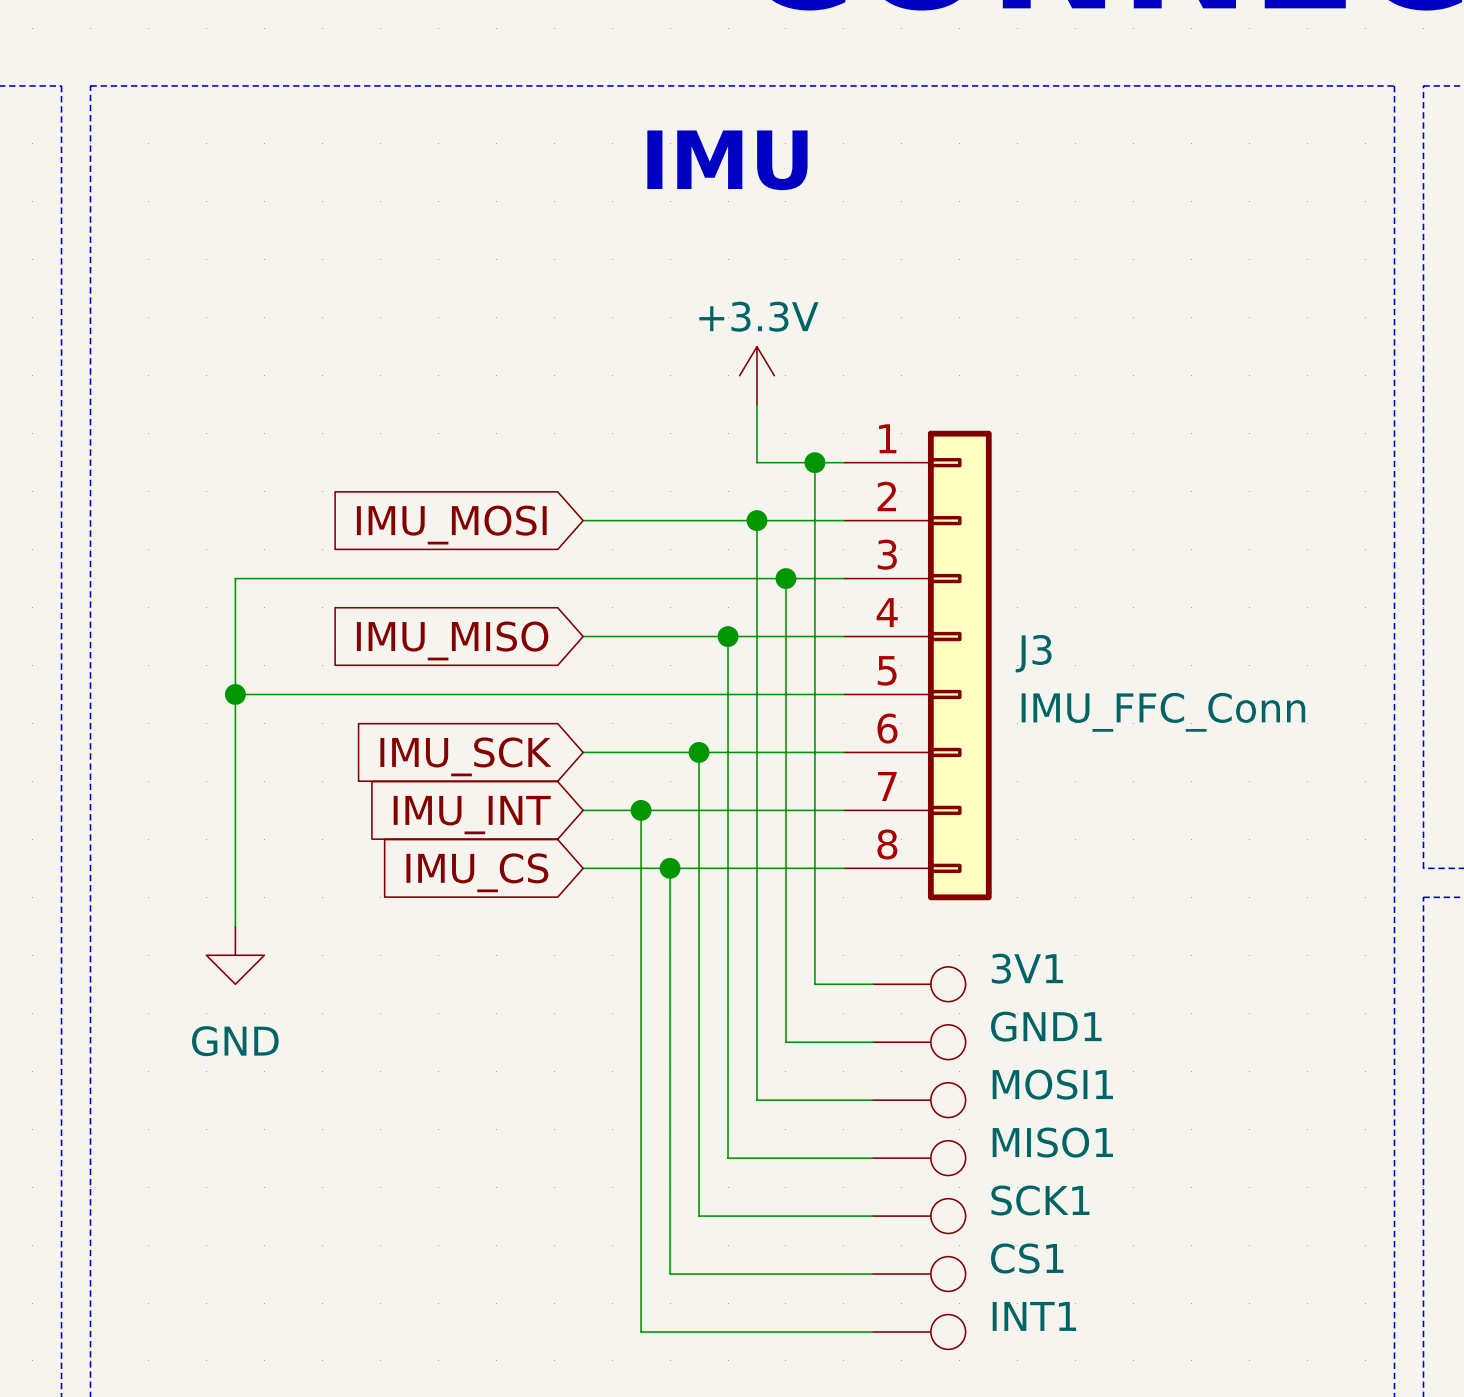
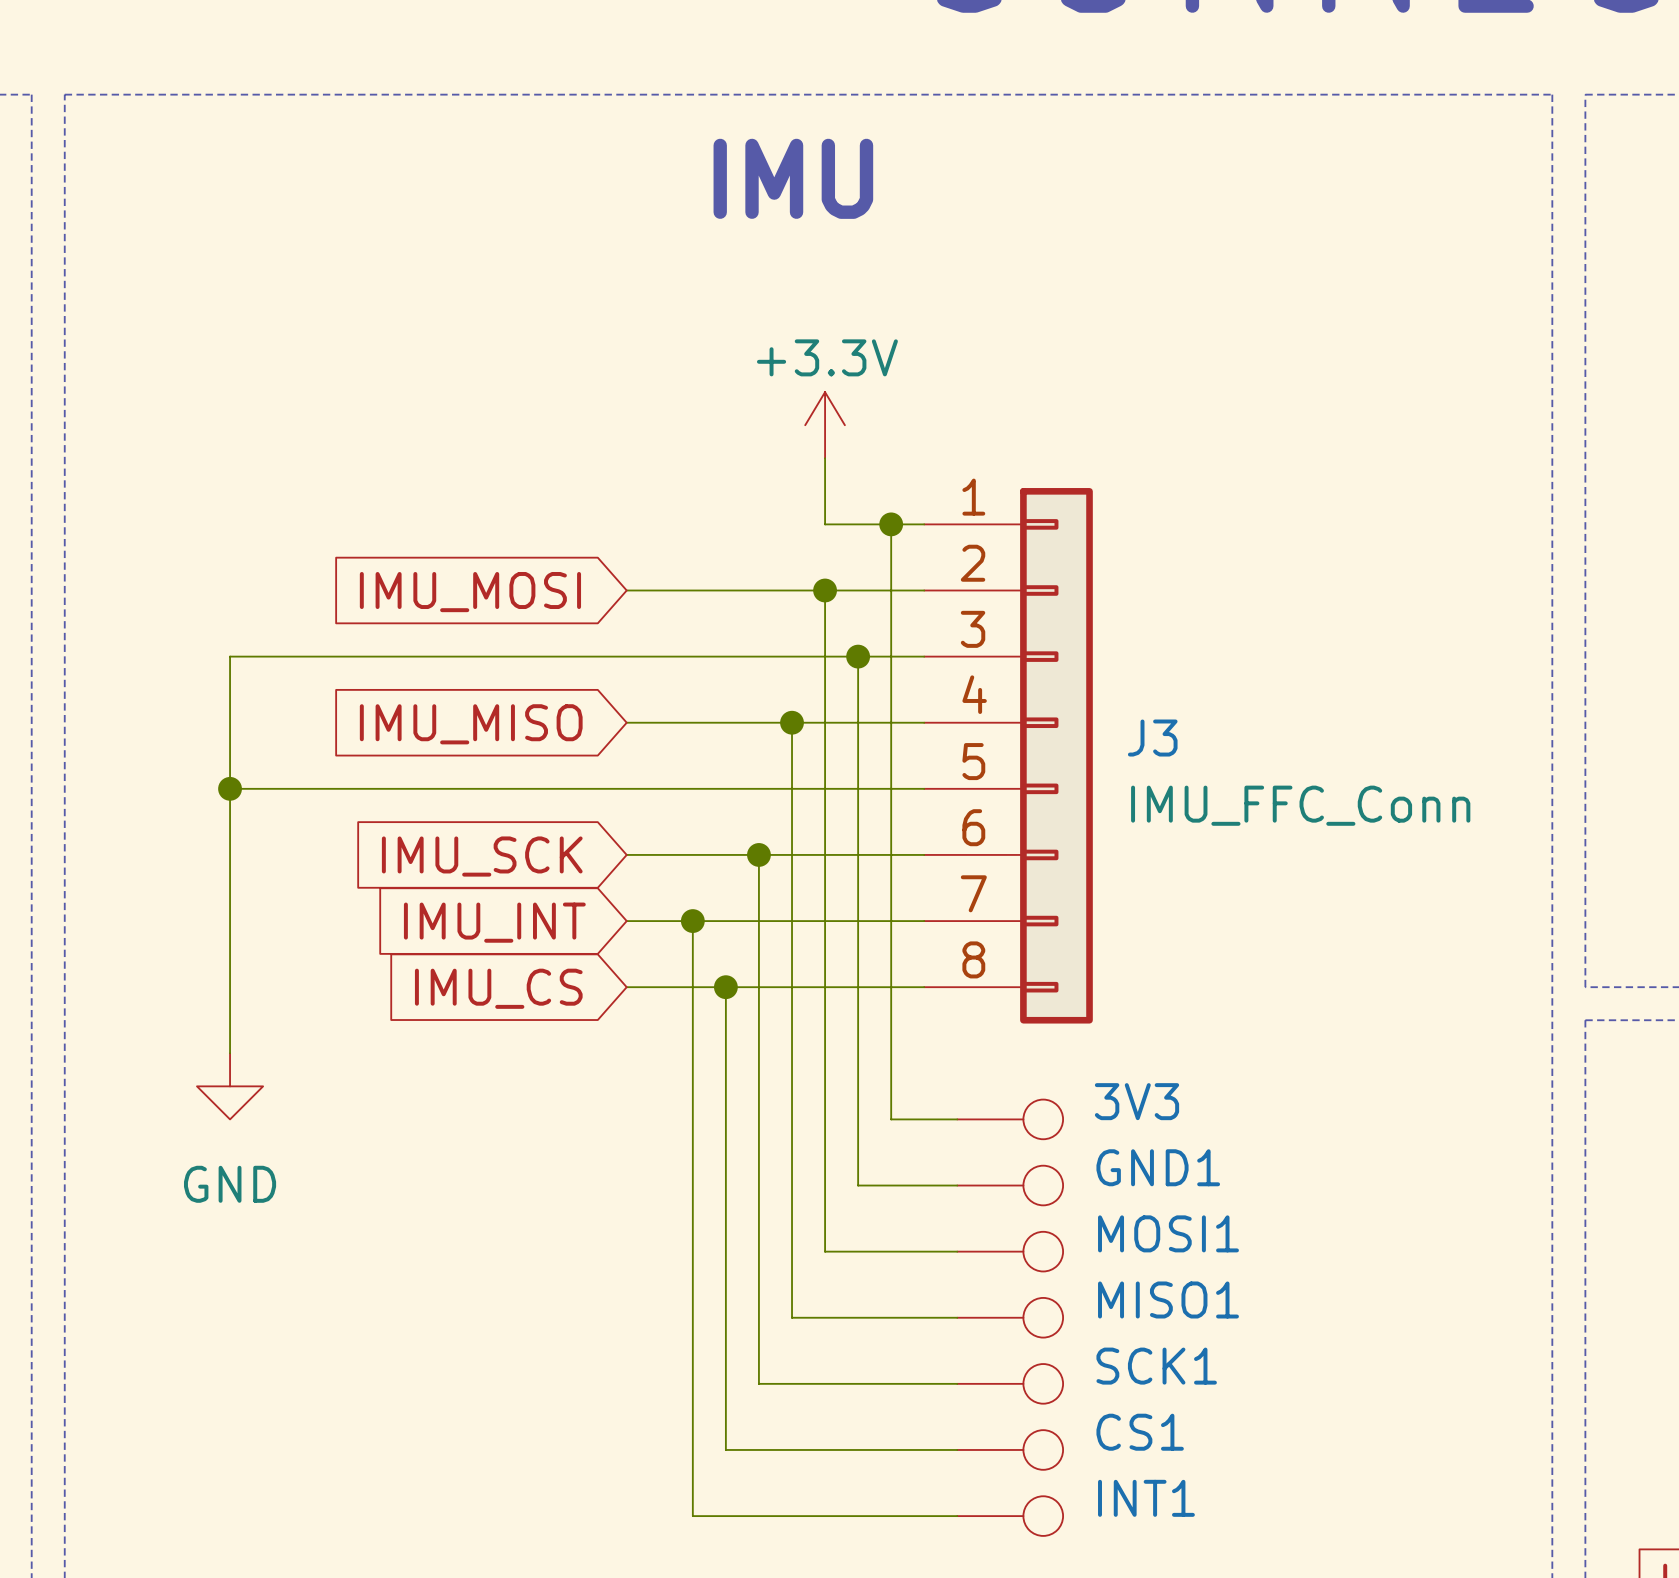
3V1 name: 3V1 (1027, 968) -> 3V3 (1136, 1101)

